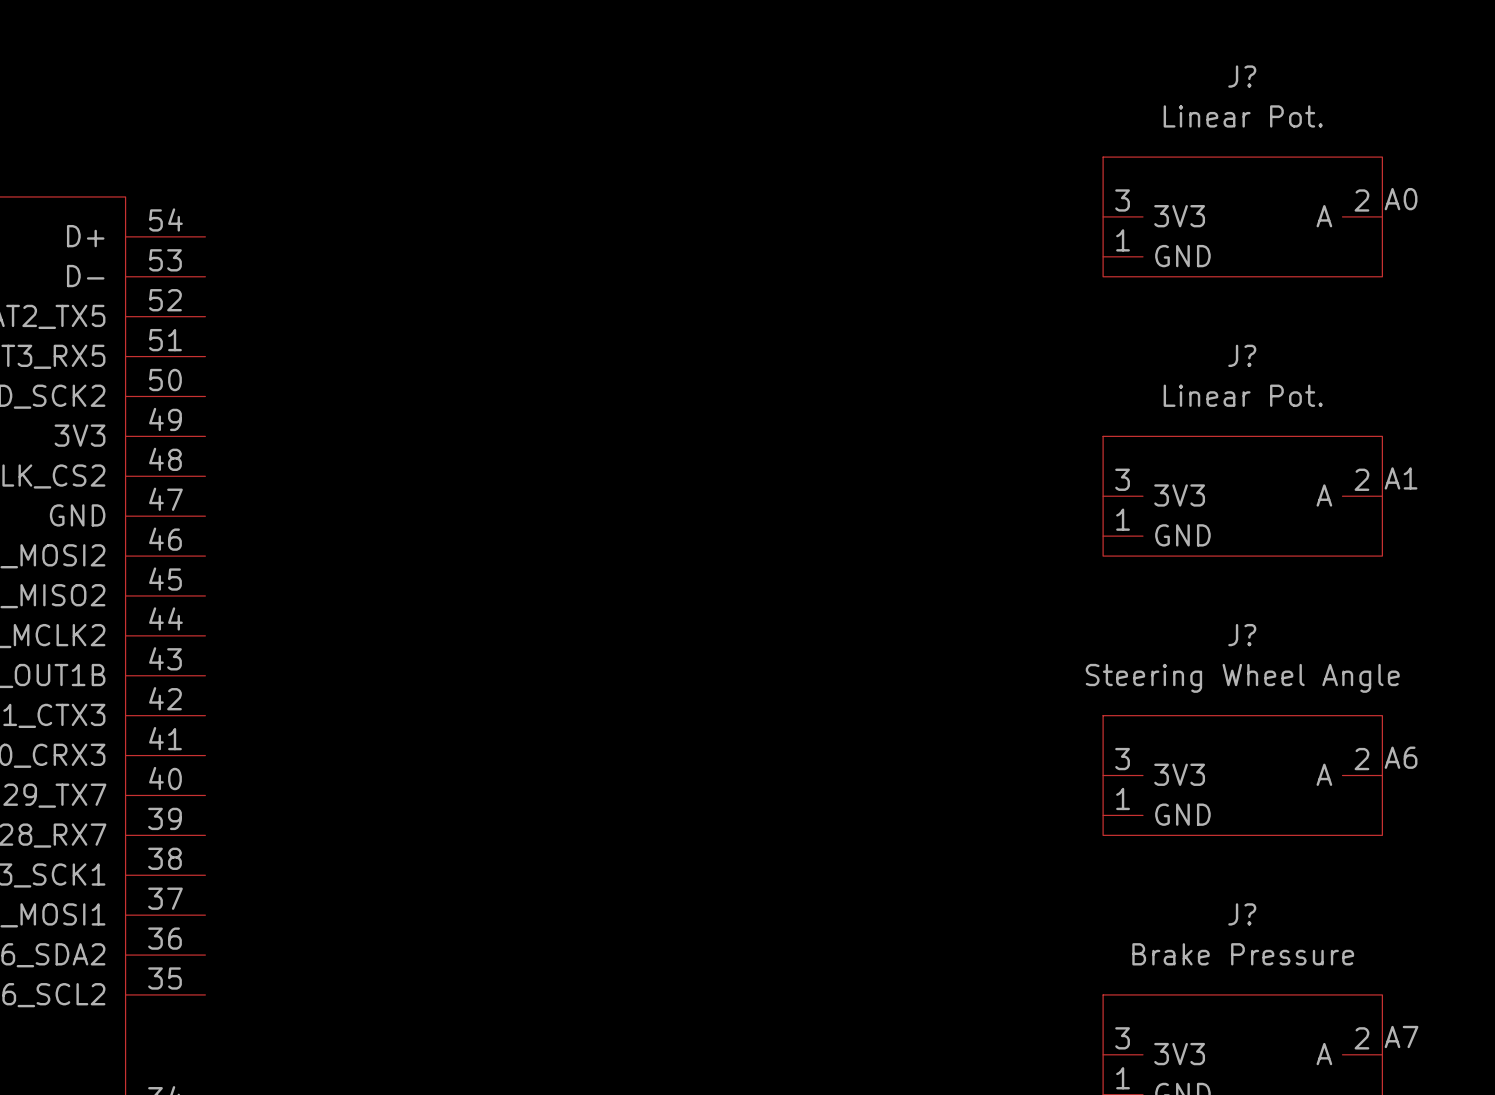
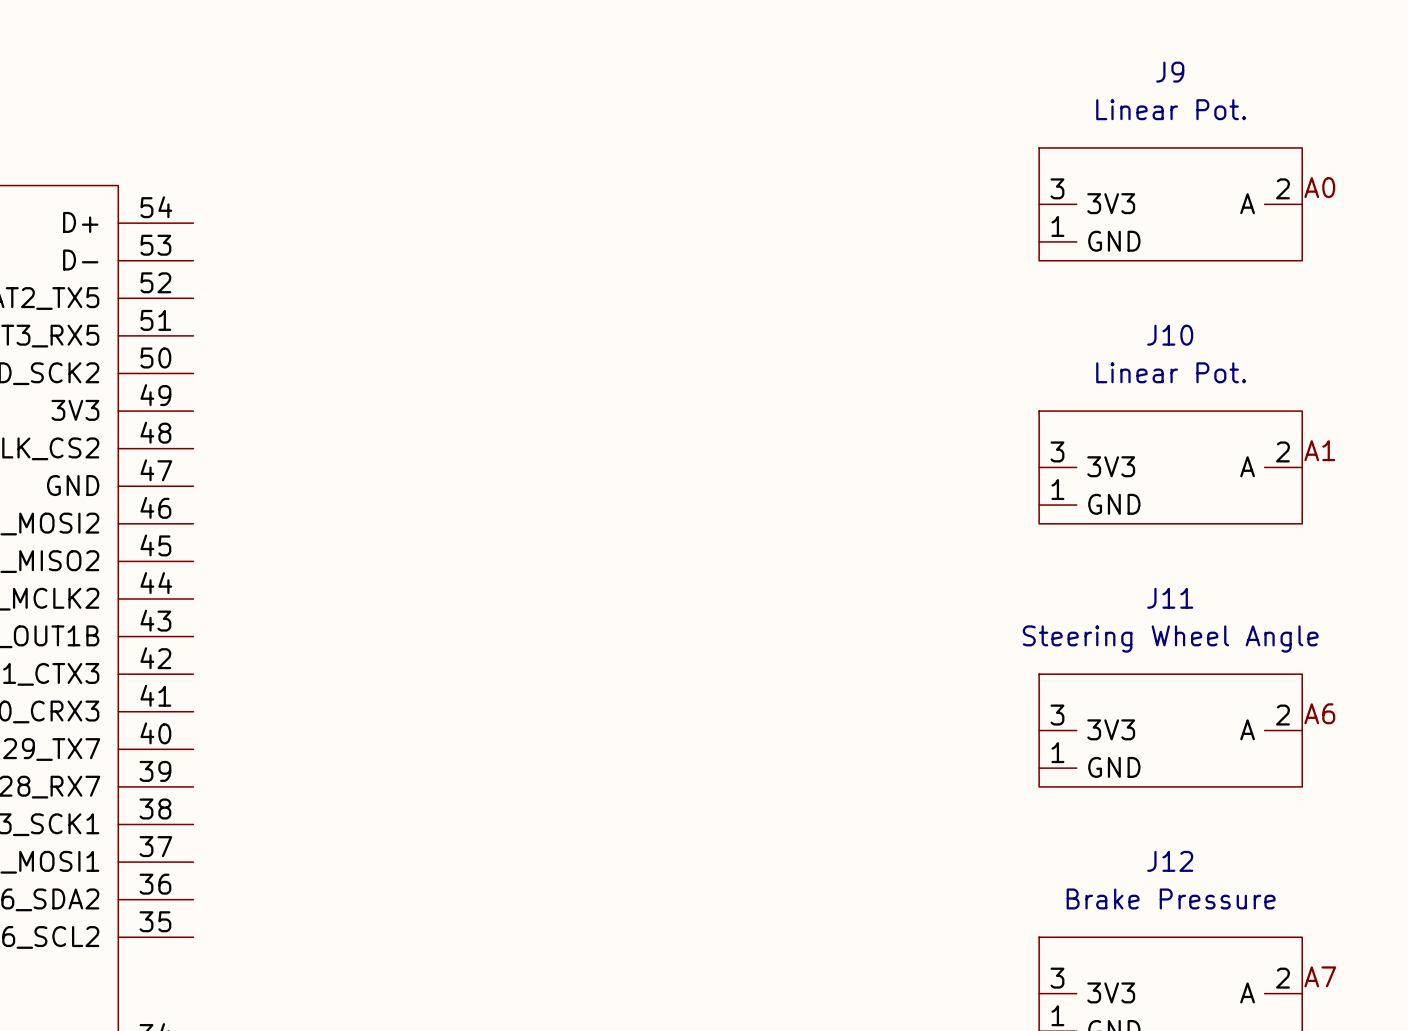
J? name: J? (1242, 76) -> J9 (1170, 72)
J? name: J? (1242, 355) -> J10 (1170, 335)
J? name: J? (1242, 635) -> J11 (1170, 598)
J? name: J? (1242, 914) -> J12 (1170, 861)

